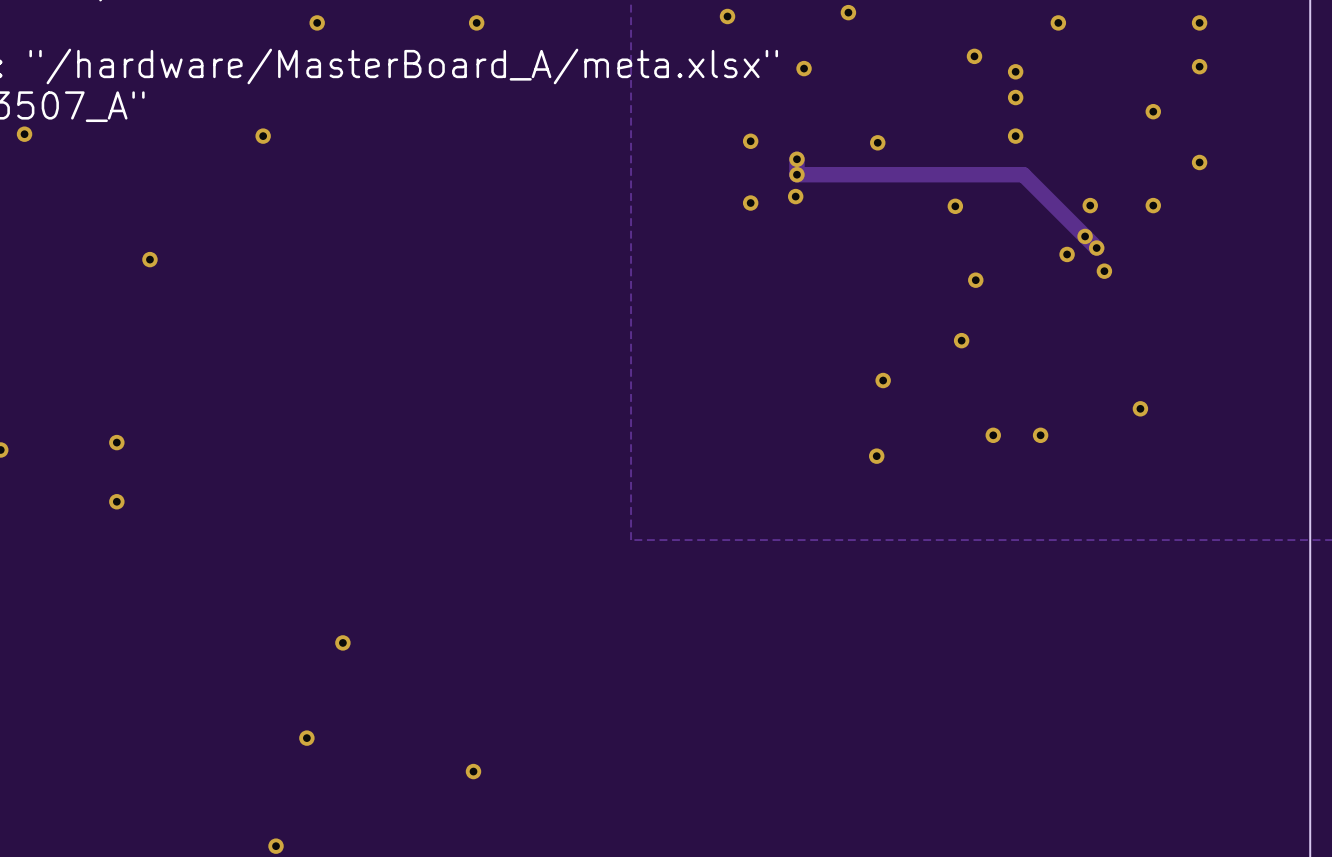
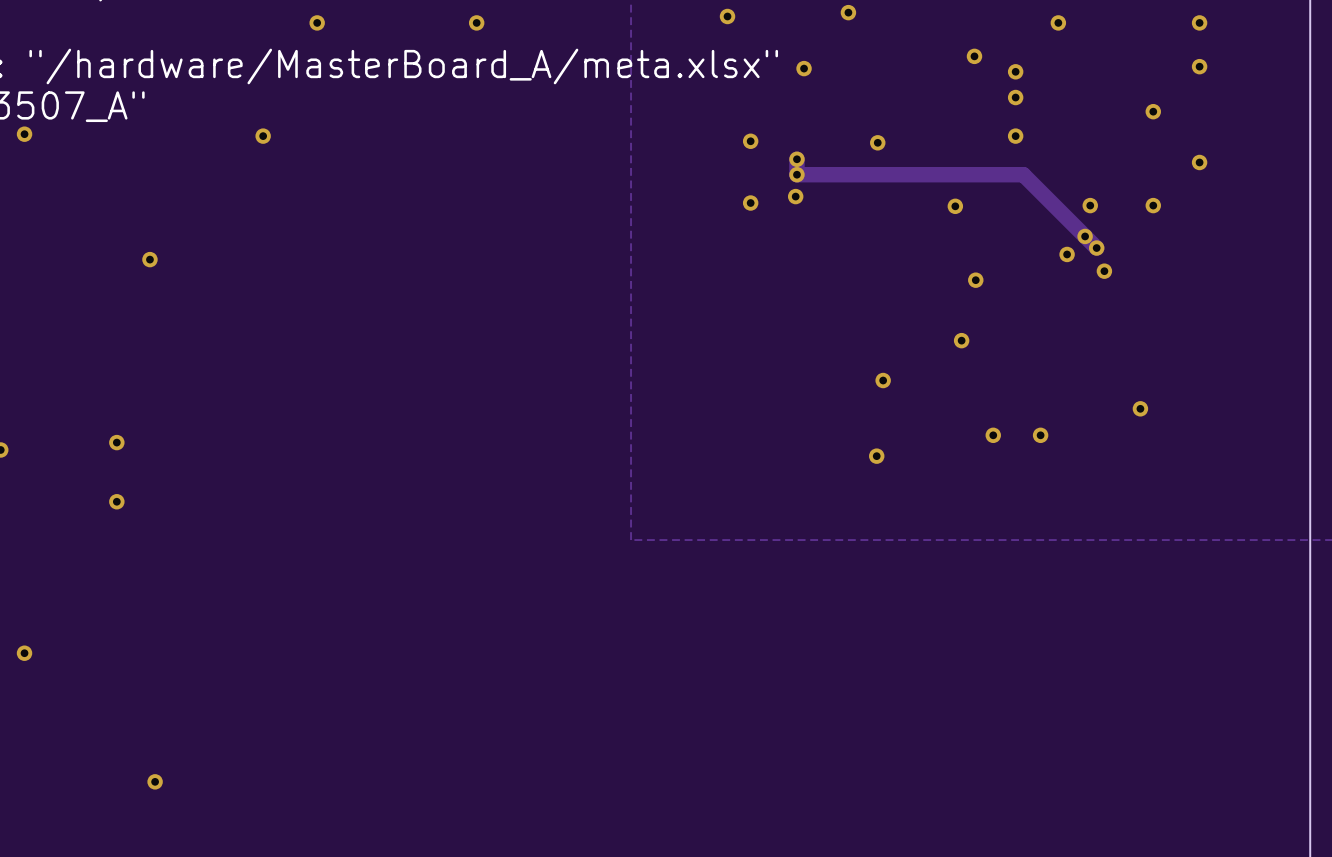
via: (342, 642) -> none
via: none -> (24, 653)
via: (306, 738) -> none
via: (473, 771) -> none
via: none -> (155, 781)
via: (276, 846) -> none

